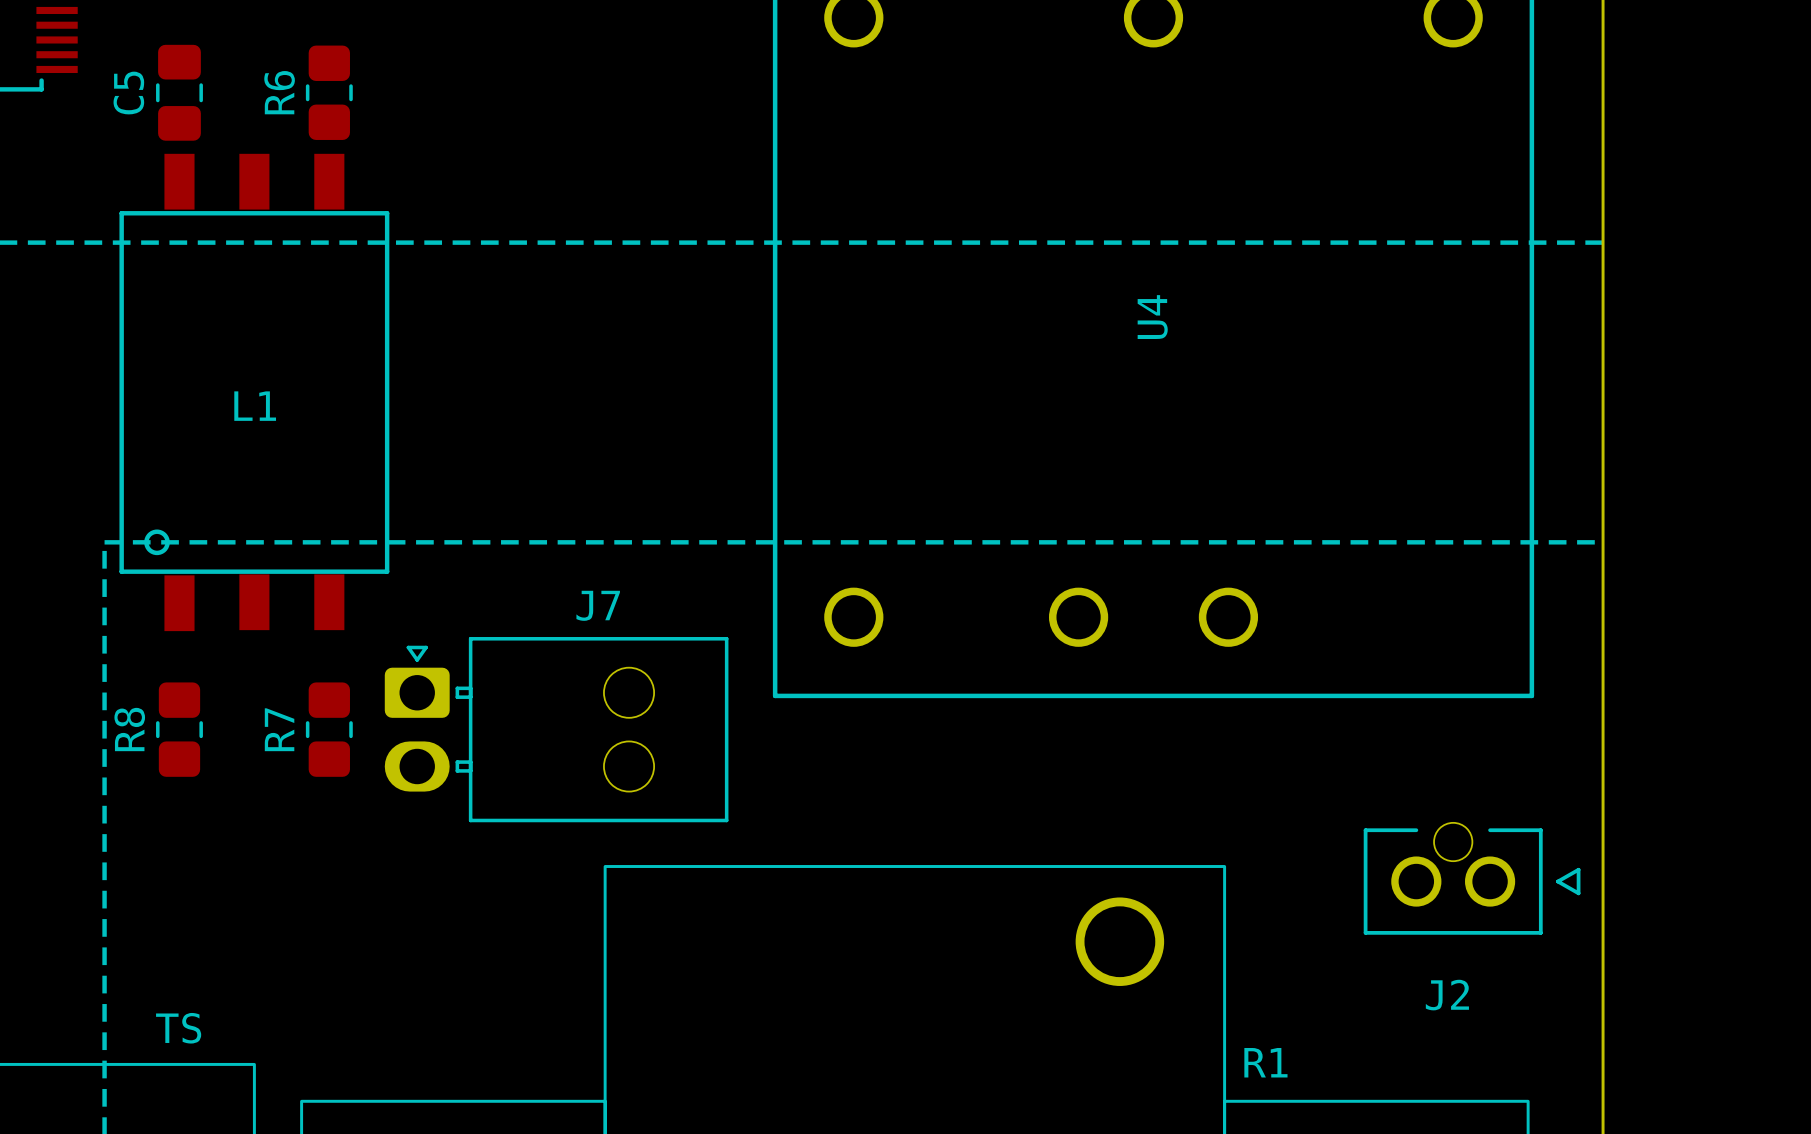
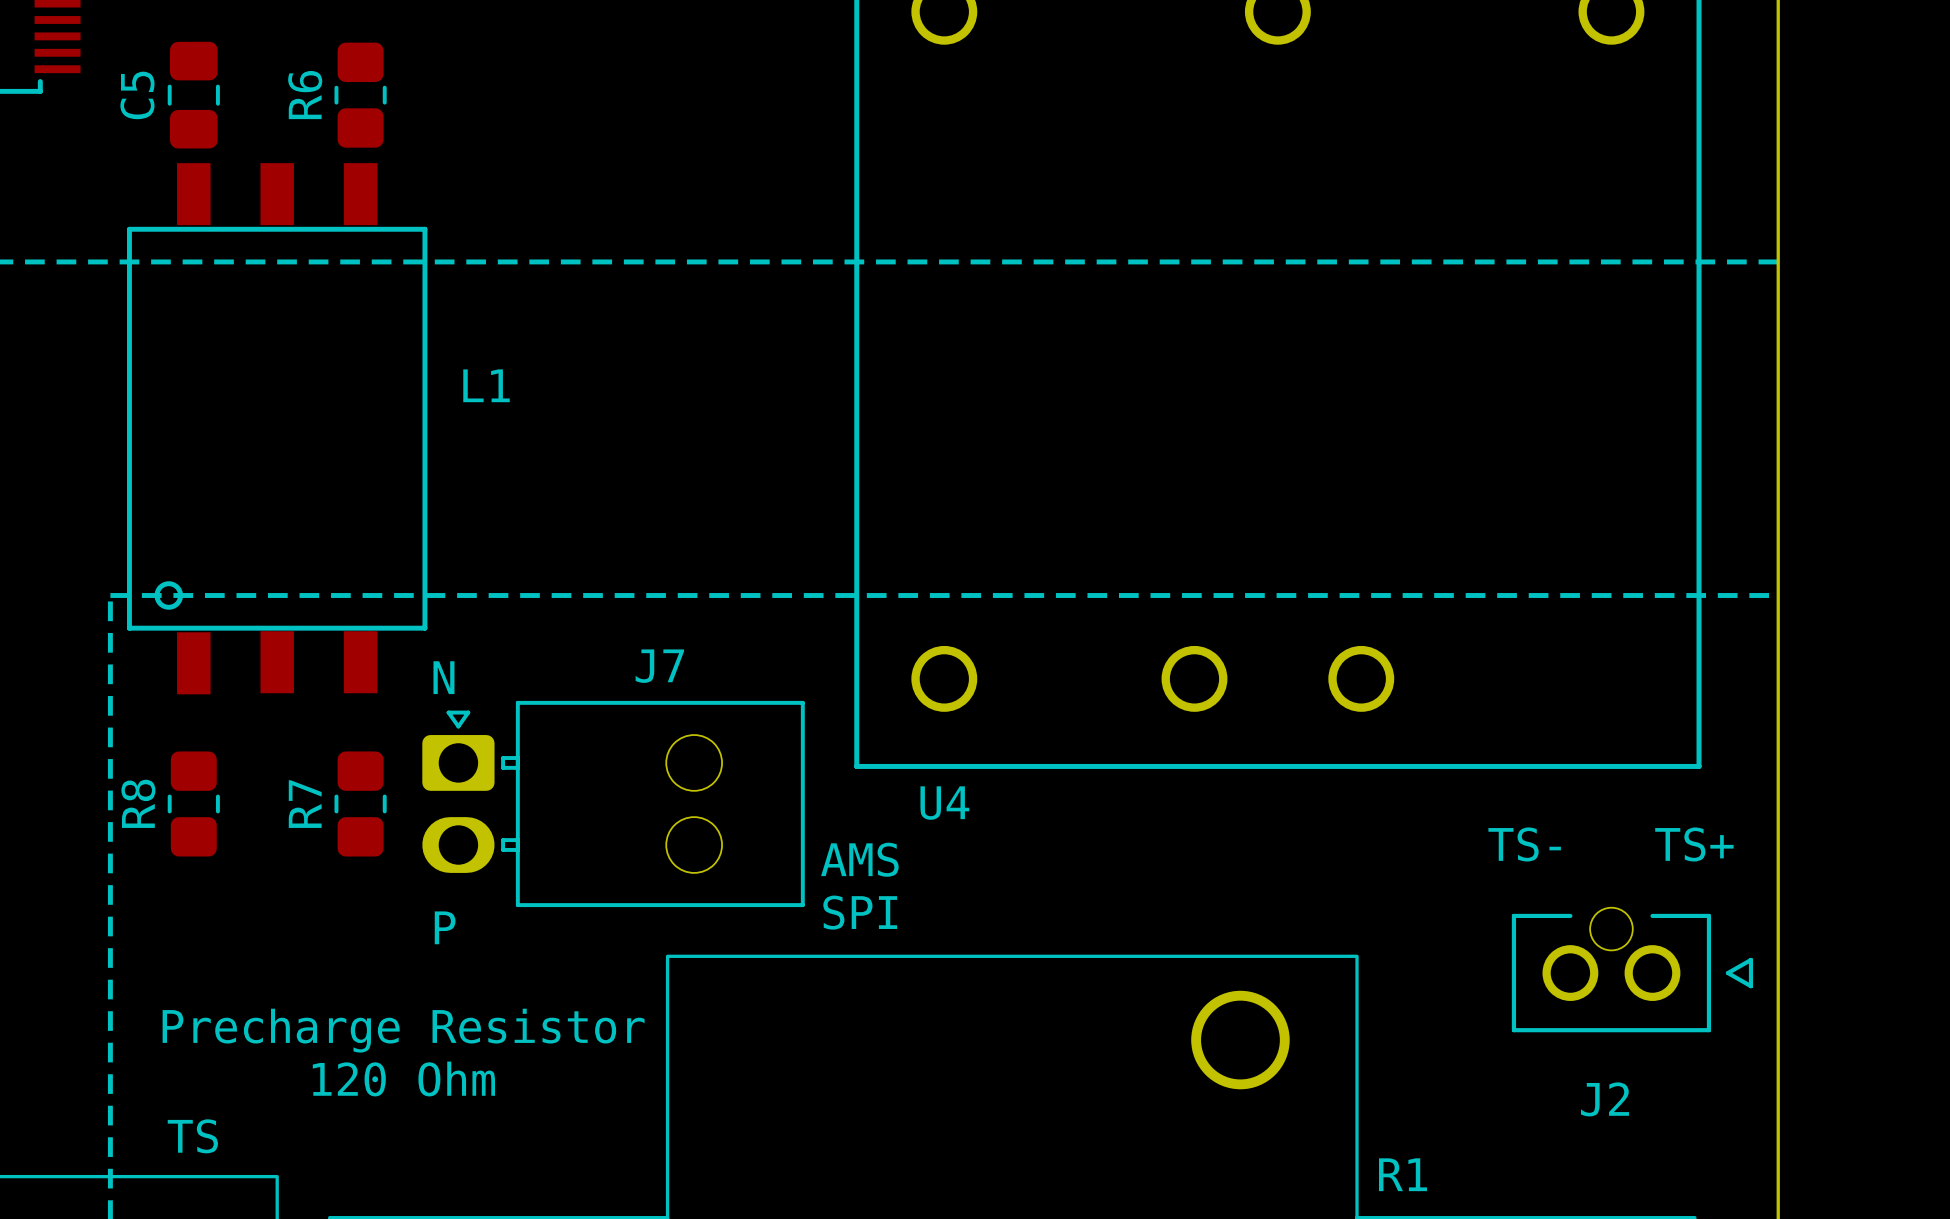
U4 name rotation: 0° (1152, 317) -> 90° clockwise (944, 803)
U4 name position: U4 (1152, 317) -> U4 (944, 803)
L1 name position: L1 (255, 406) -> L1 (486, 385)
text: none -> N (443, 677)
text: none -> TS- (1524, 844)
text: none -> TS+ (1694, 844)
text: none -> AMS (859, 859)
text: none -> SPI (860, 912)
text: none -> P (445, 927)
text: none -> Precharge Resistor (403, 1030)
text: none -> 120 Ohm (403, 1078)

